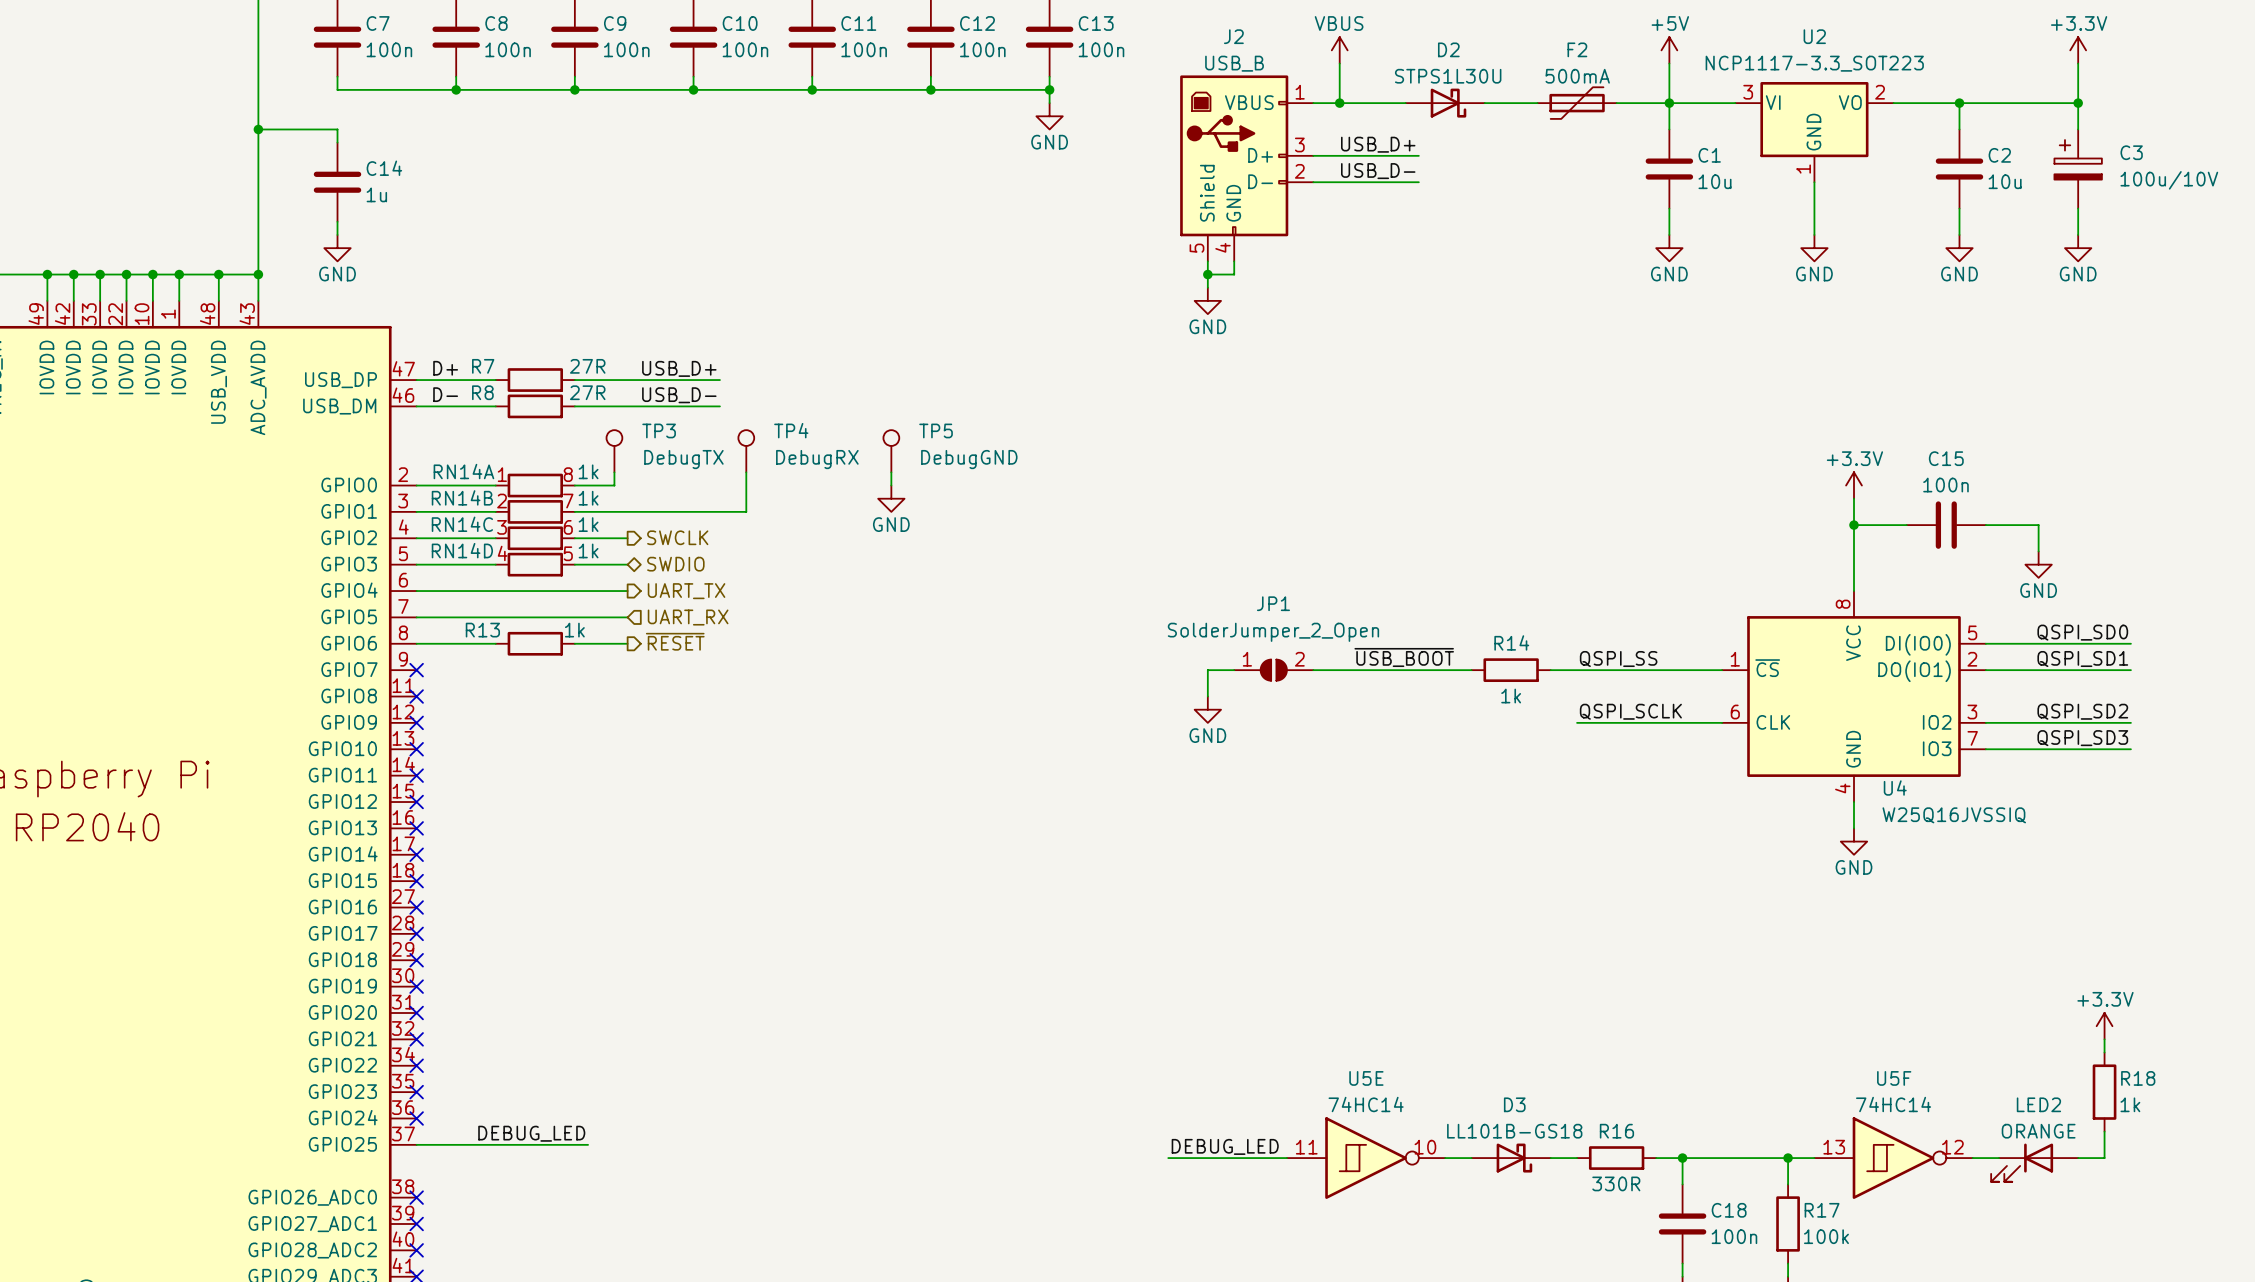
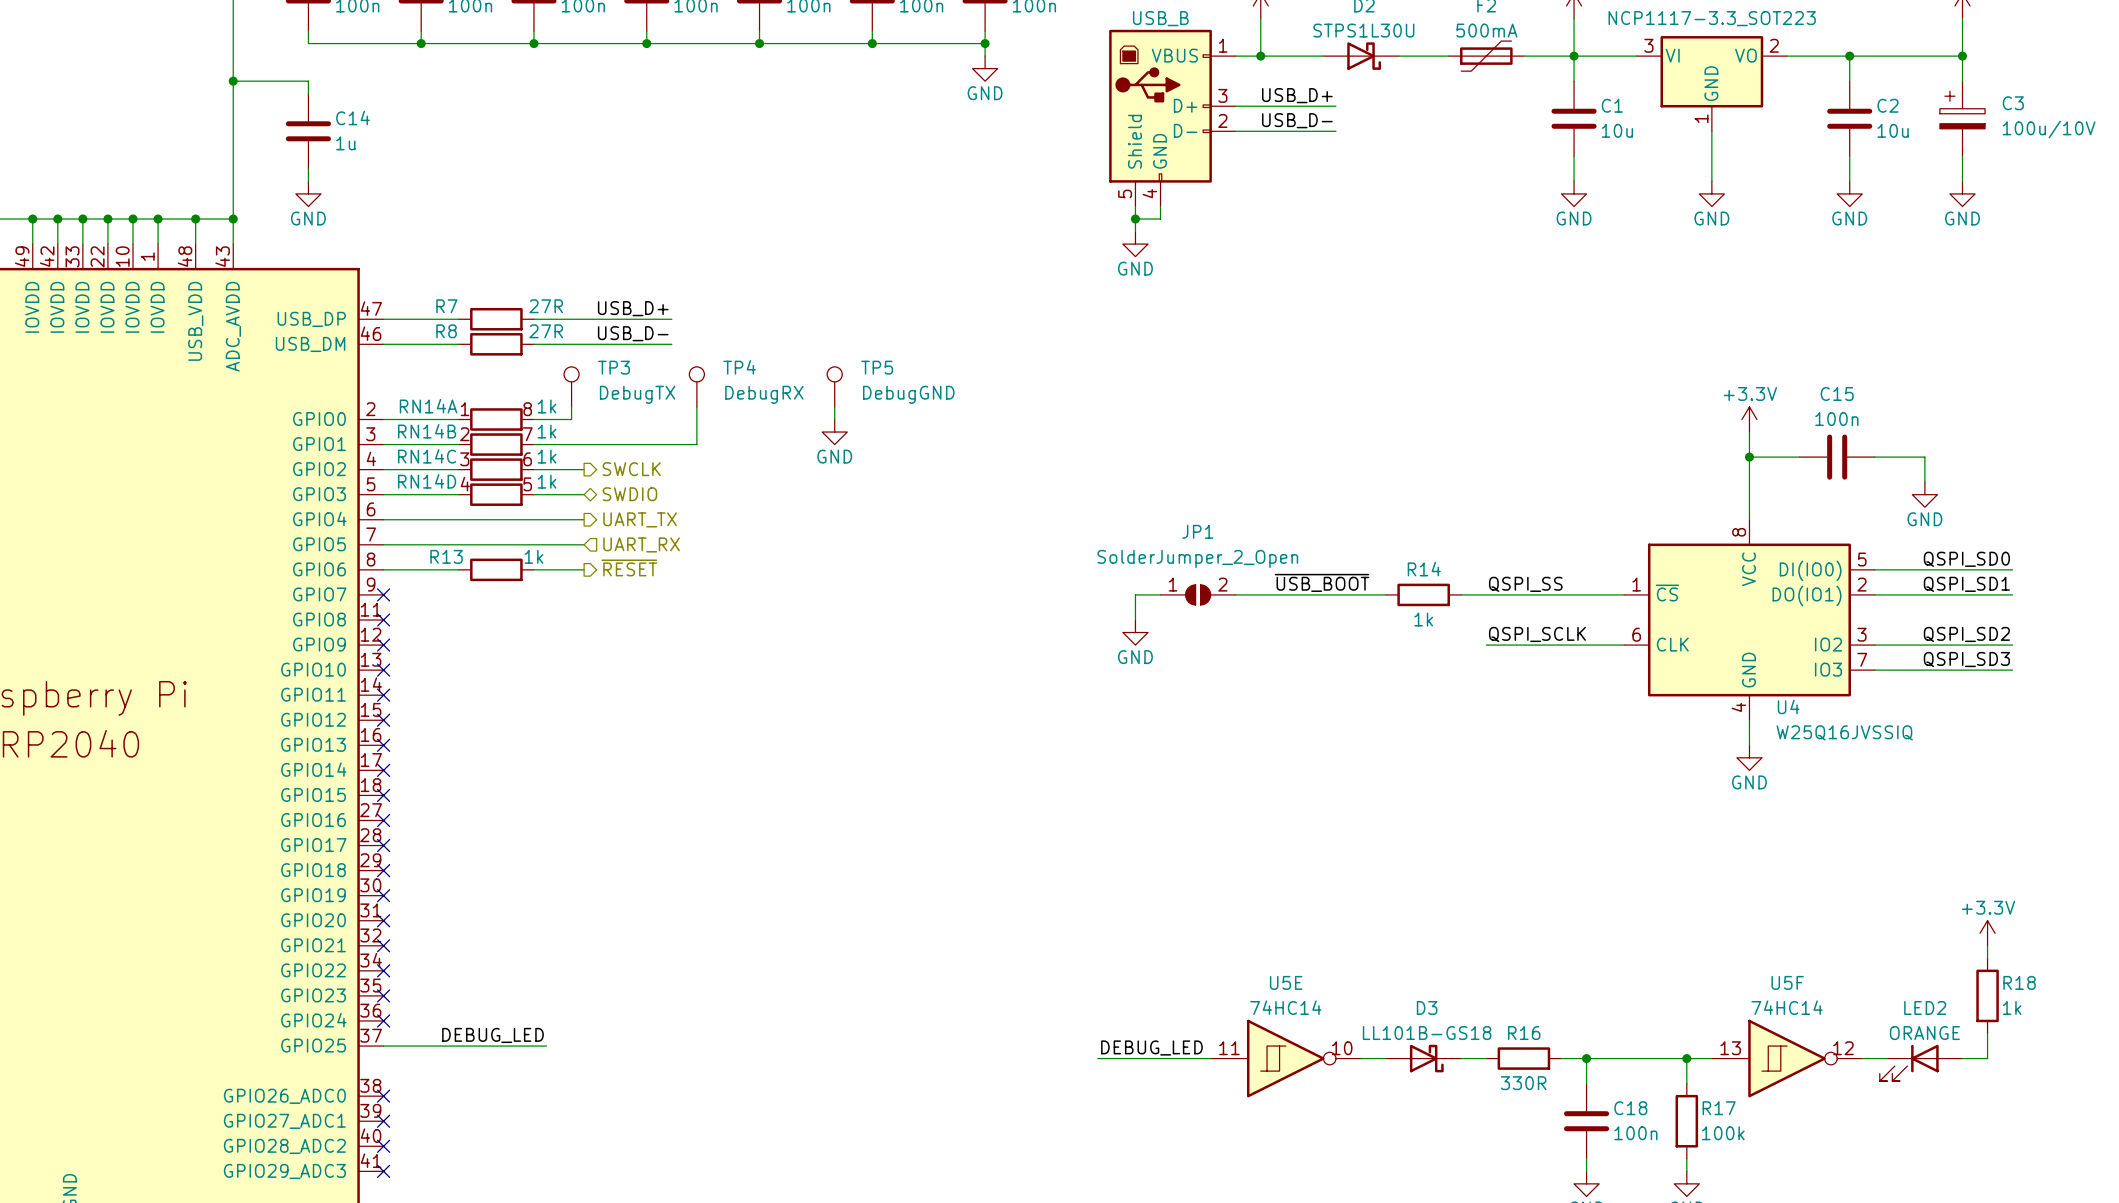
label: D+ (445, 368) -> none
label: D- (445, 394) -> none

